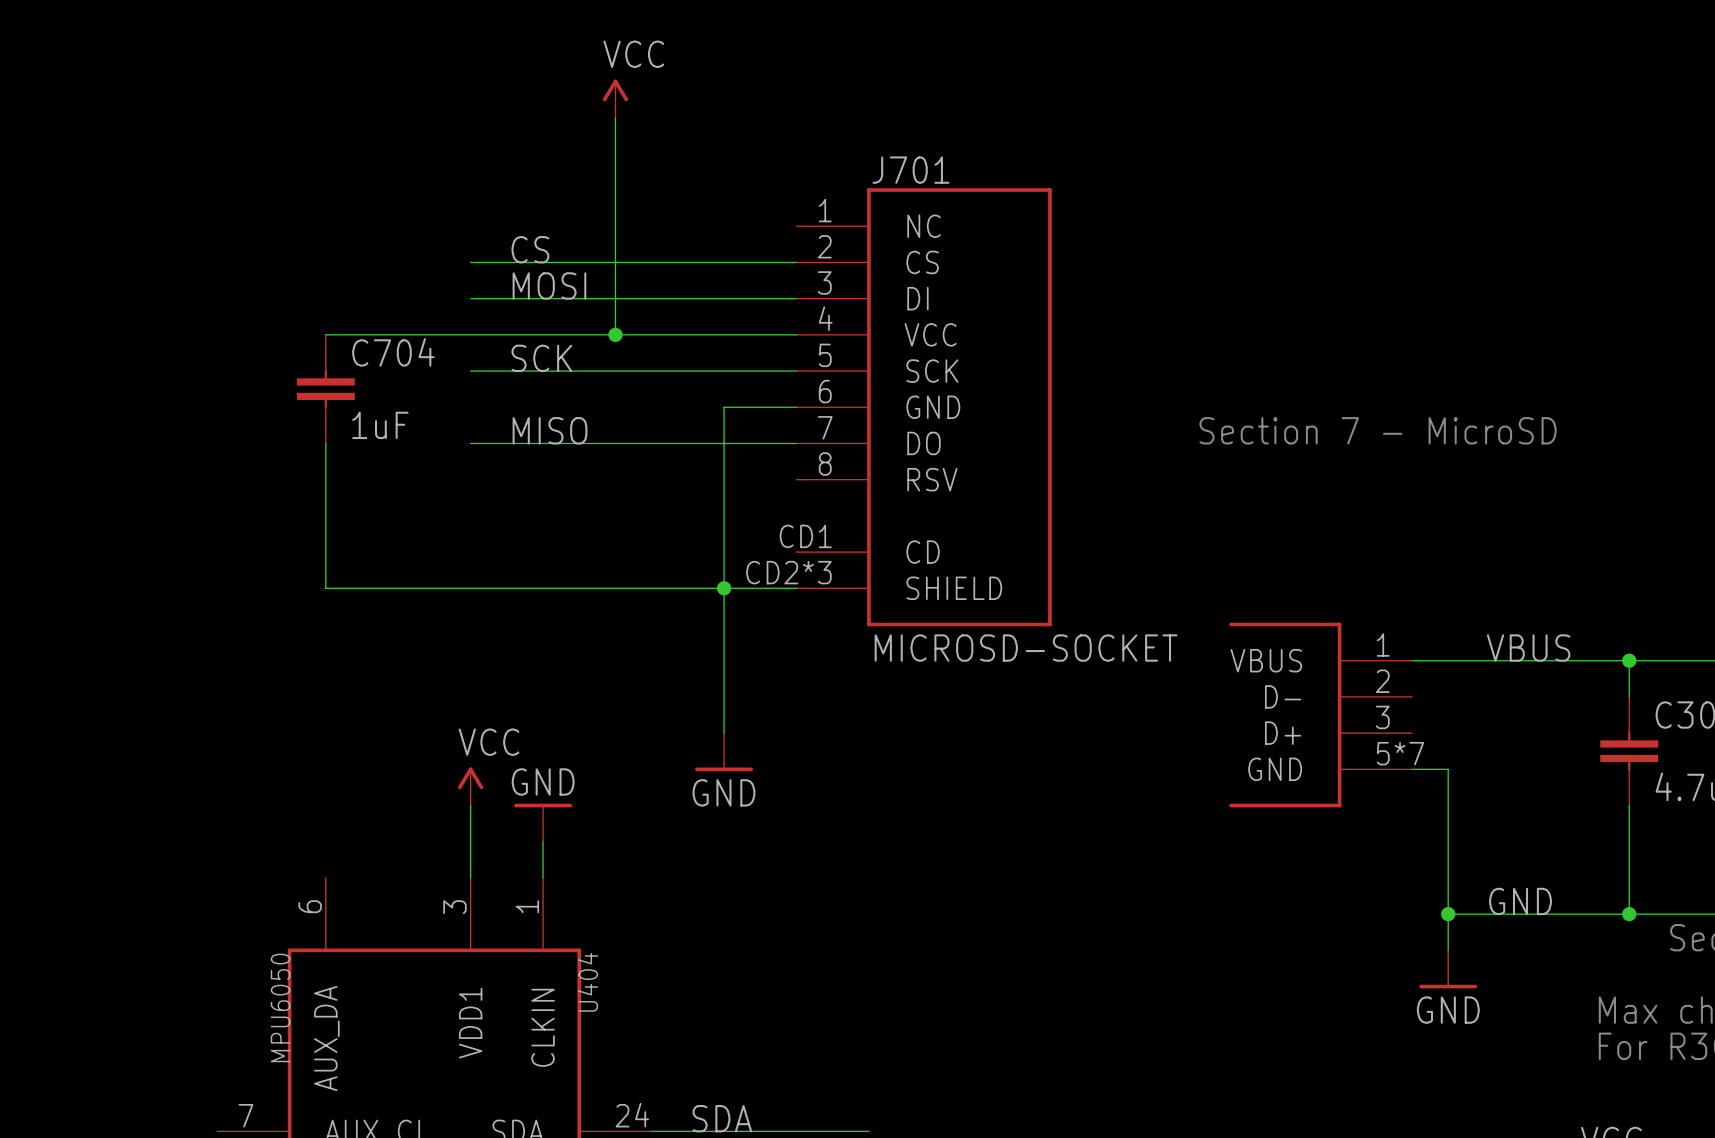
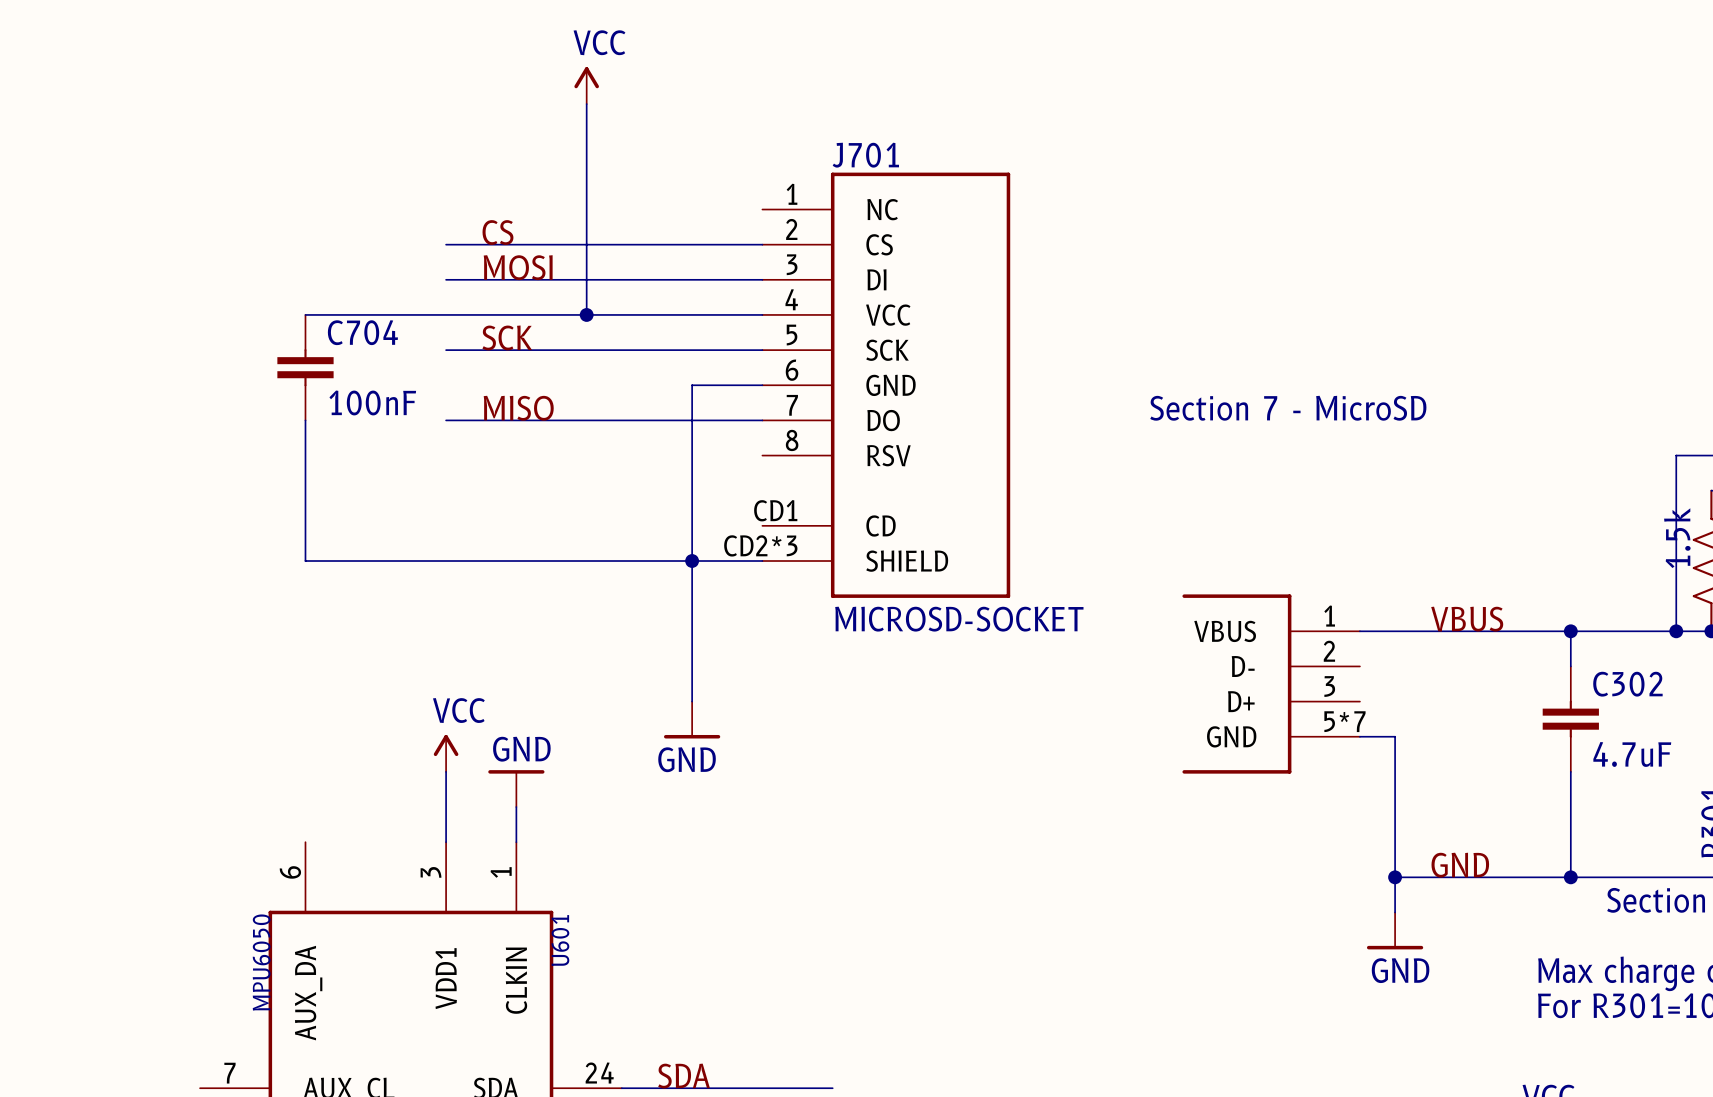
C704 value: 1uF (380, 425) -> 100nF (372, 402)
U404 name: U404 (587, 982) -> U601 (560, 940)

